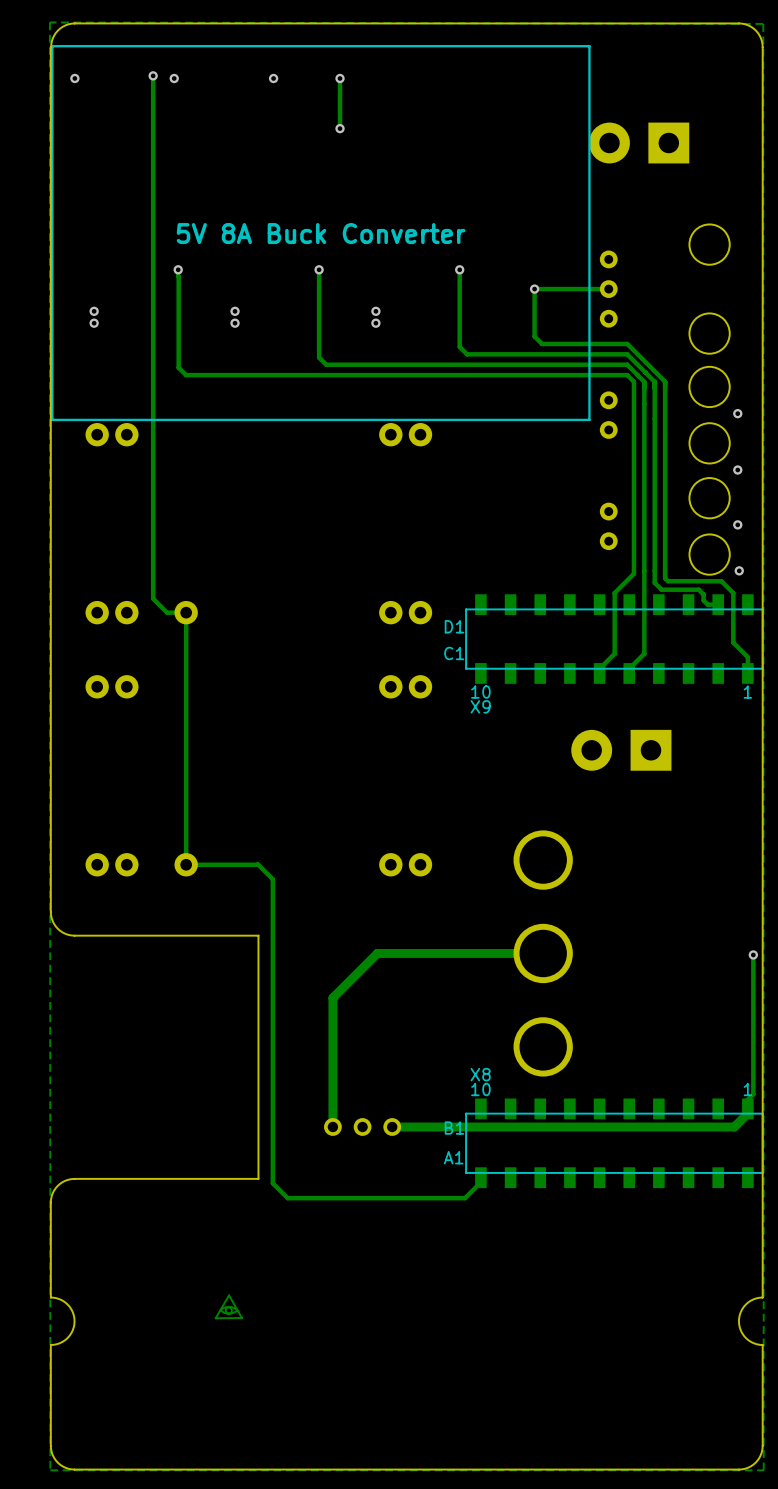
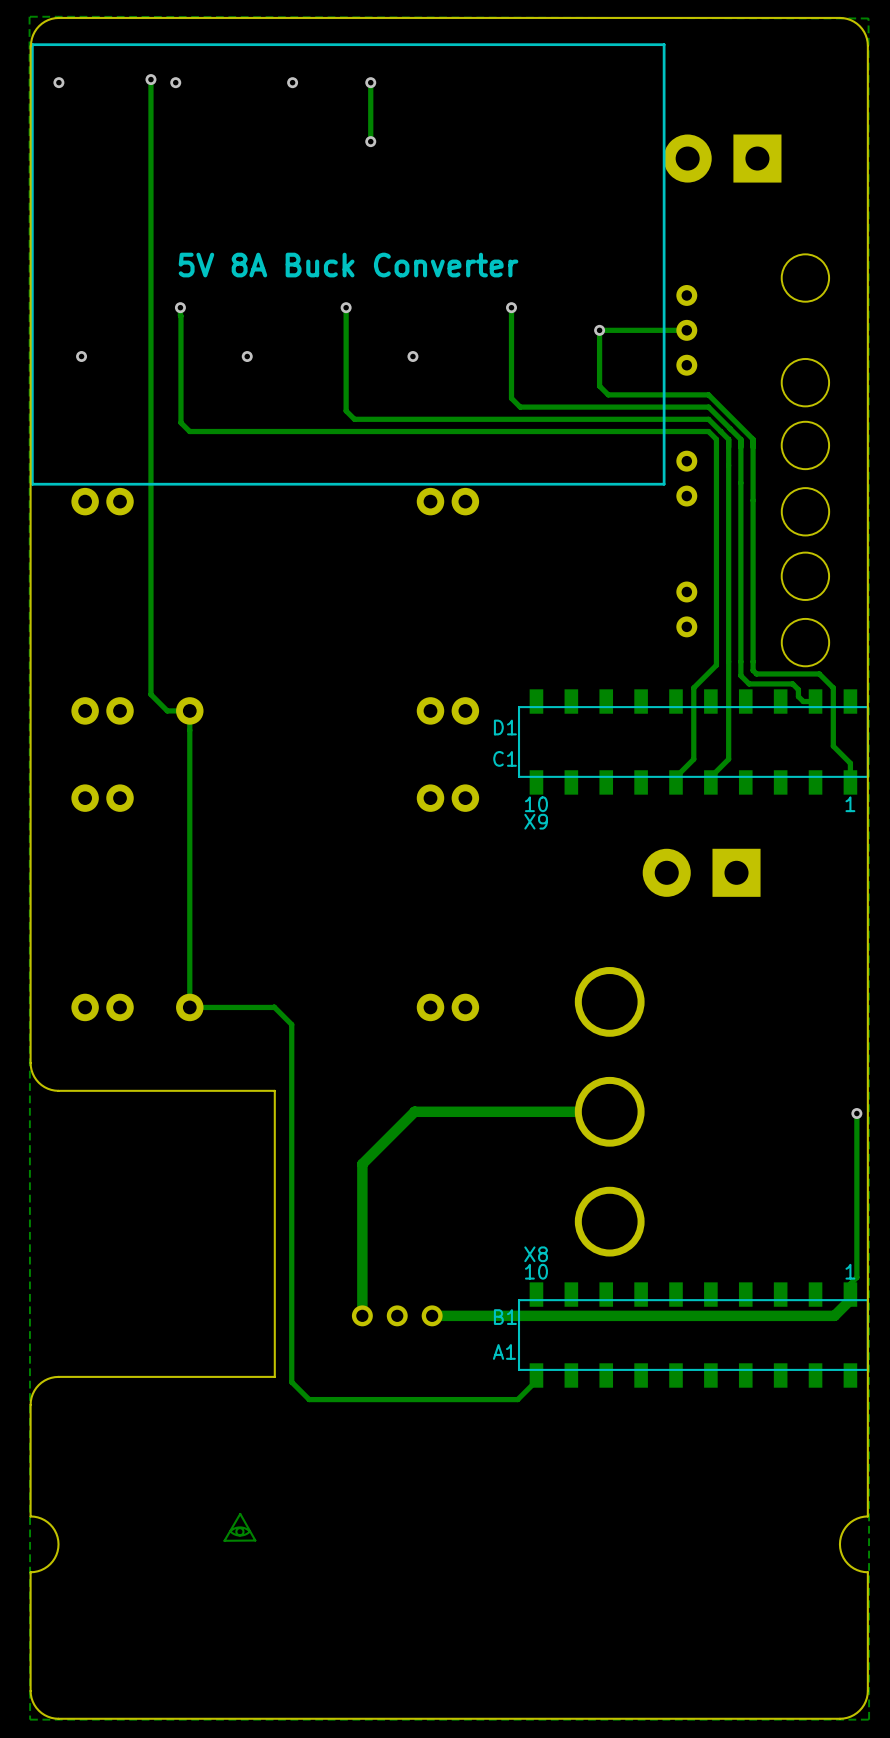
via: (94, 323) -> none
via: (235, 323) -> none
via: (375, 323) -> none
via: (737, 413) -> none
via: (737, 470) -> none
via: (737, 524) -> none
via: (739, 570) -> none

